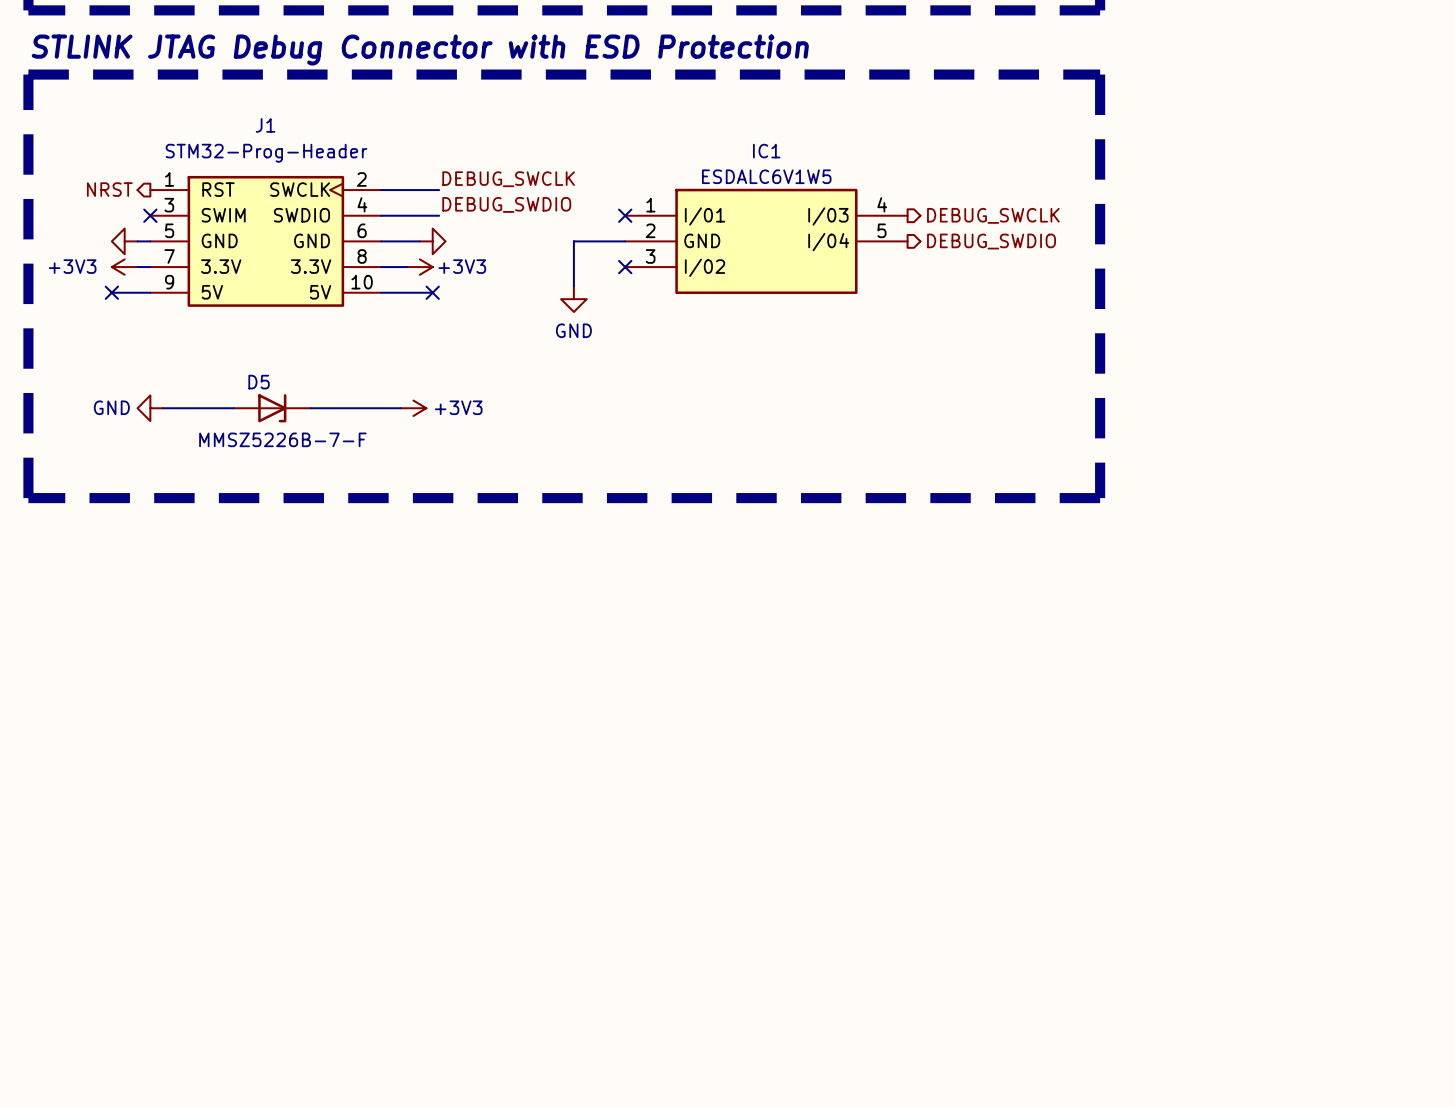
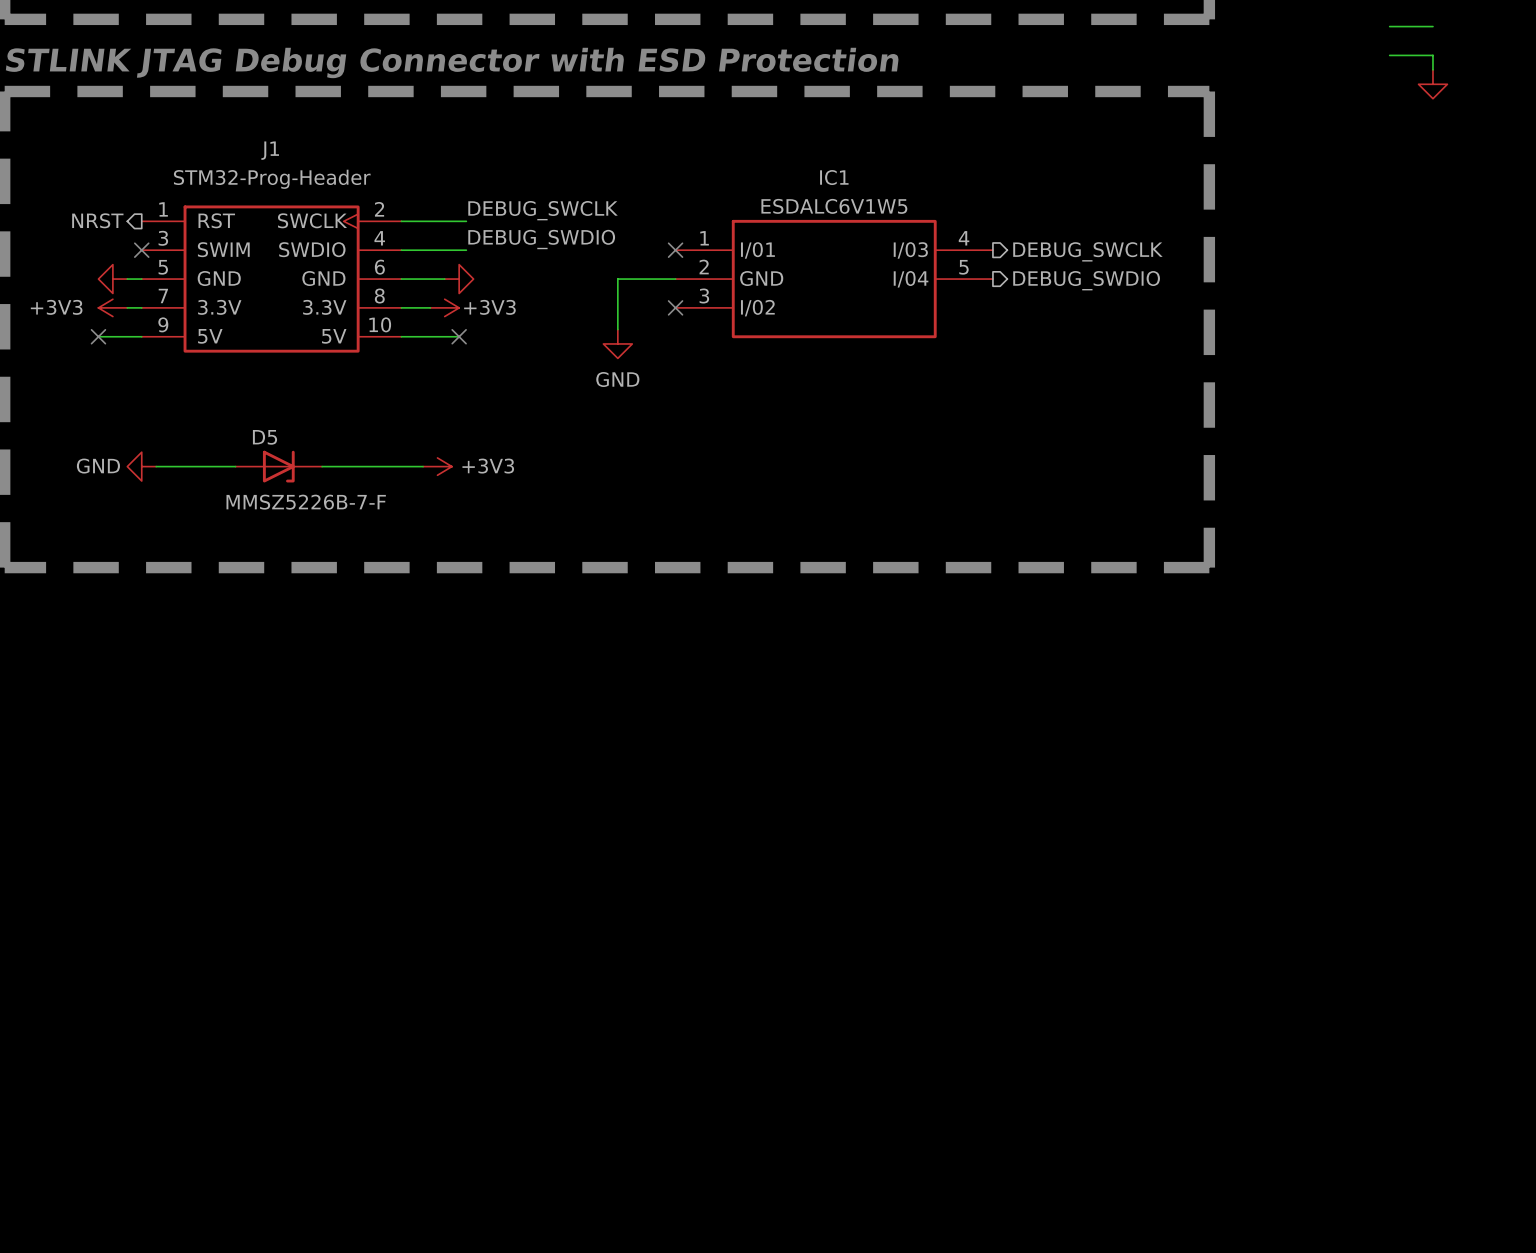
wire: none -> (1389, 26) (1432, 26)
wire: none -> (1389, 55) (1432, 55) (1432, 69)
power symbol: none -> (1432, 84)

